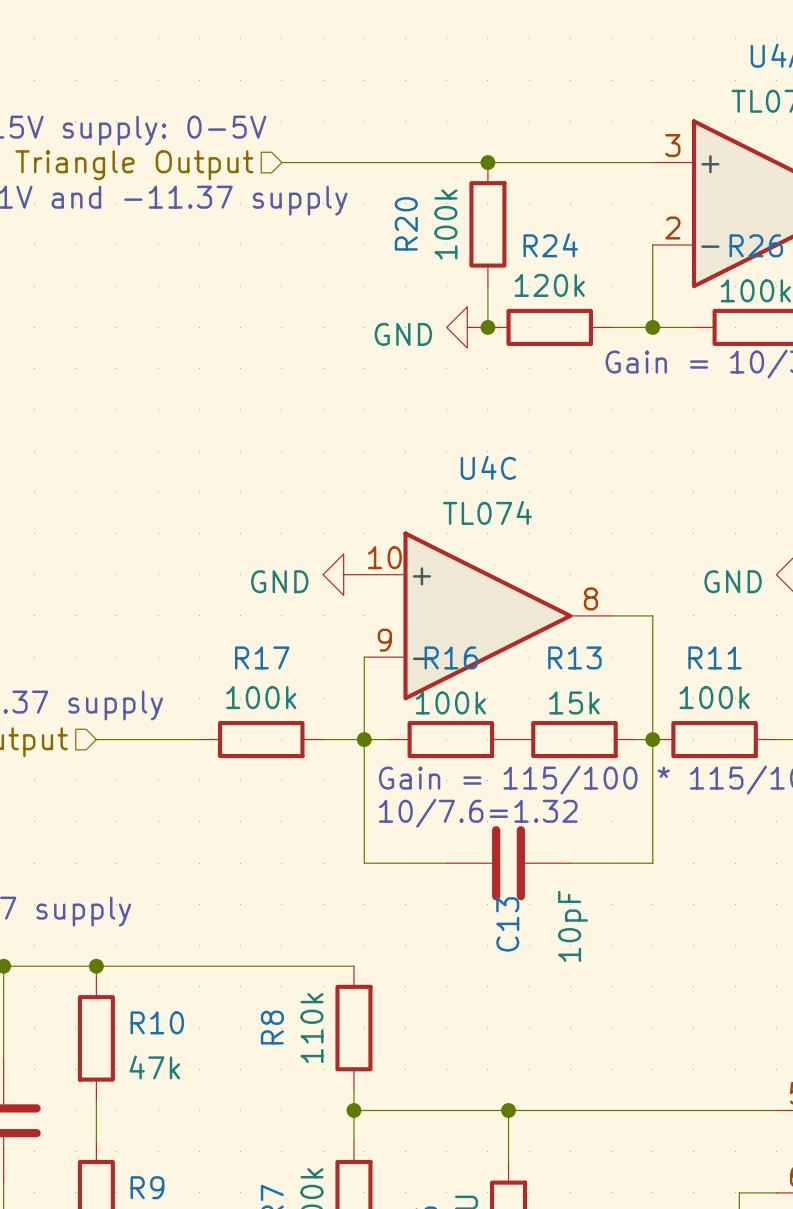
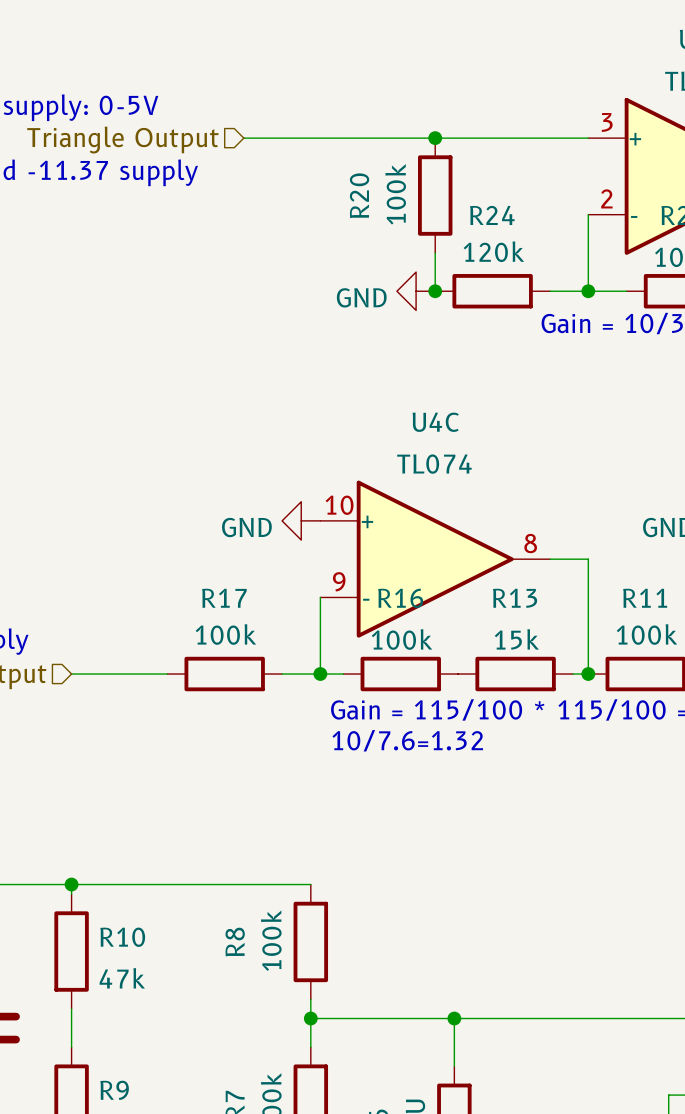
wire: (364, 739) (364, 863) (446, 863) -> none
wire: (652, 739) (652, 863) (570, 863) -> none
C13: 10pF (508, 863) -> none
R8 value: 110k (311, 1028) -> 100k (271, 940)

